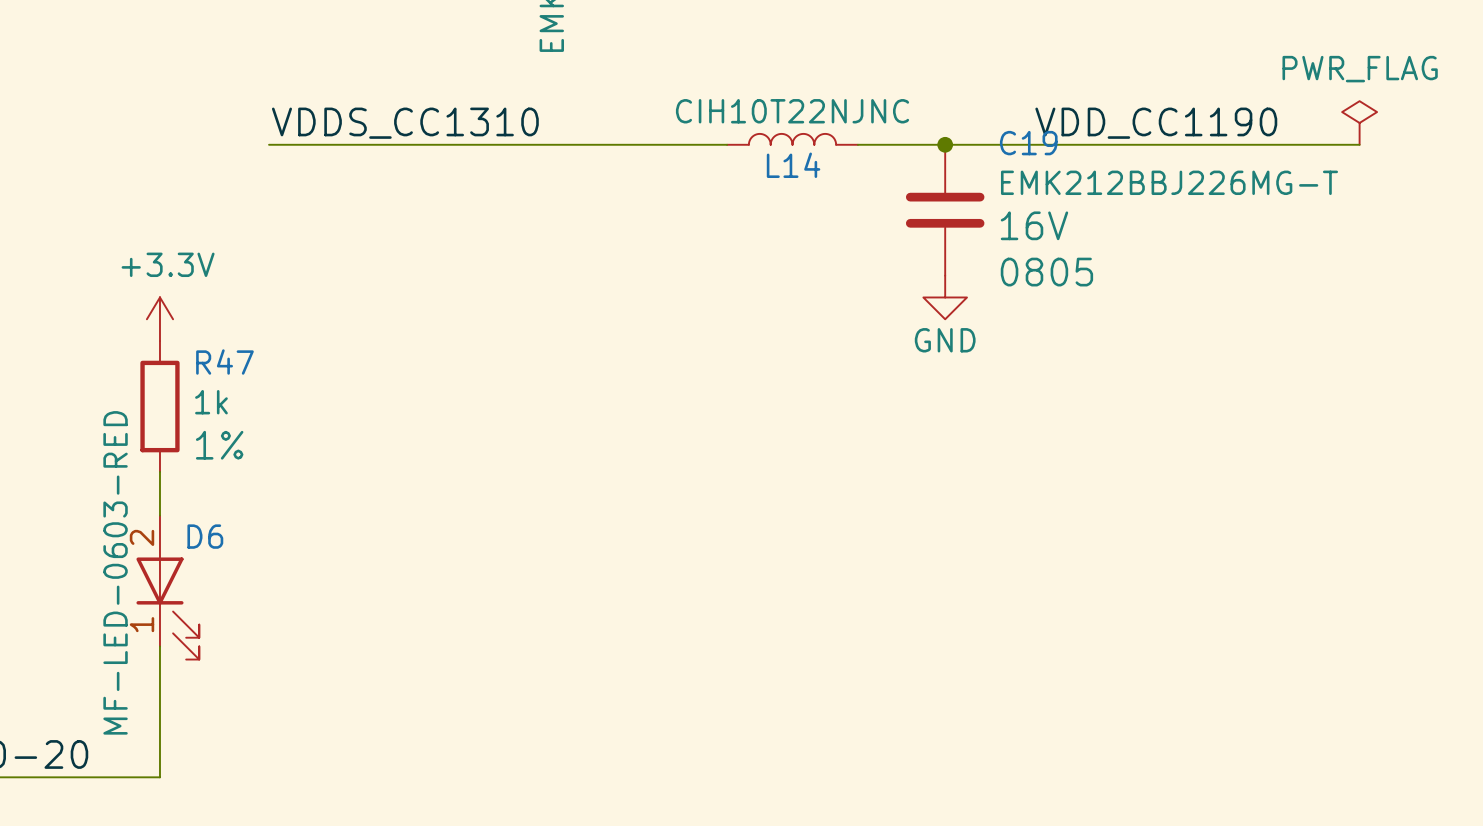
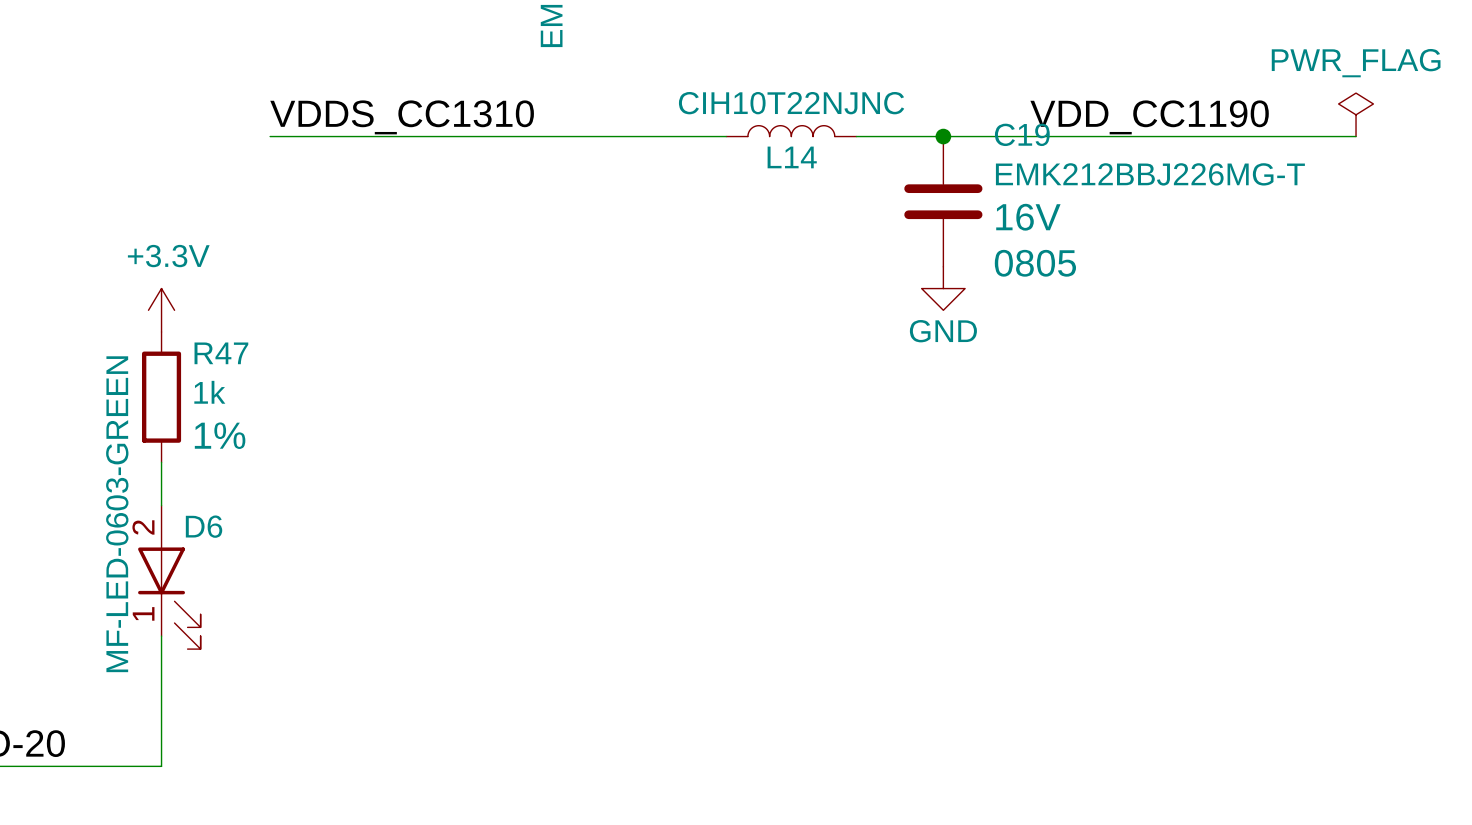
D6 value: MF-LED-0603-RED (115, 572) -> MF-LED-0603-GREEN (117, 514)

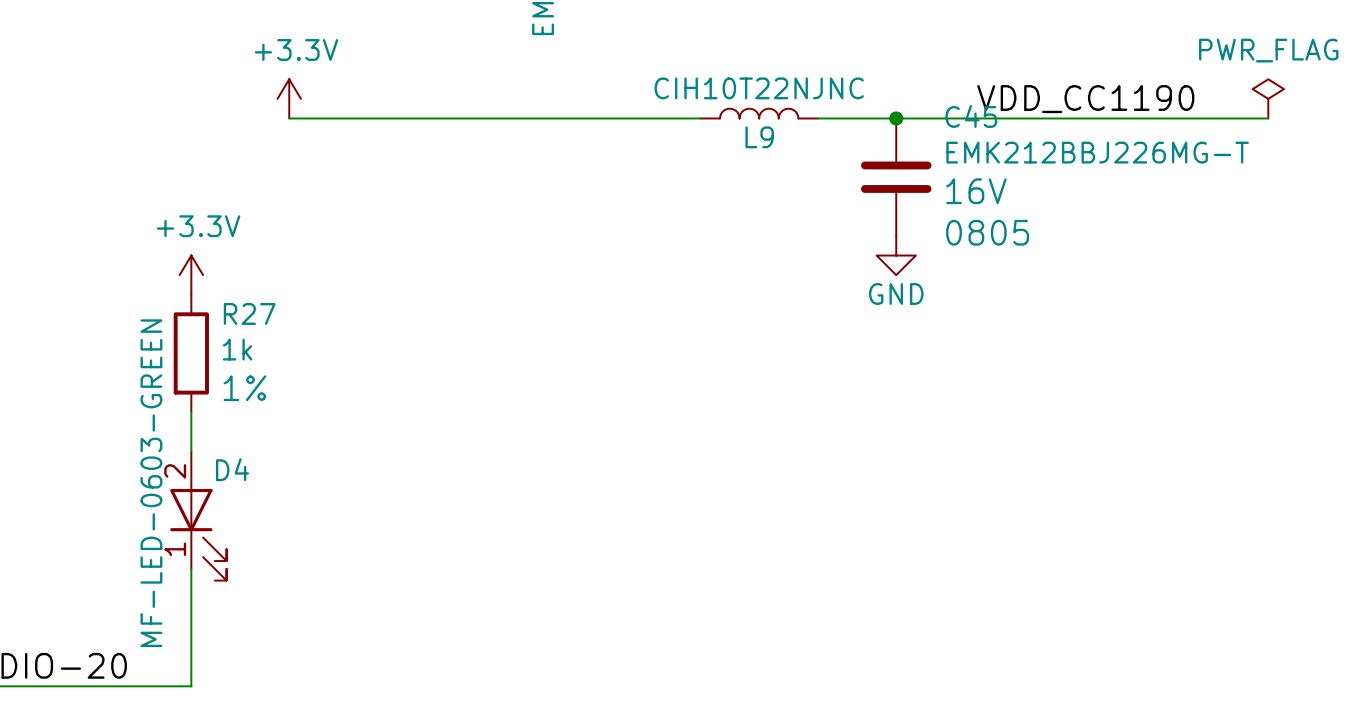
power symbol: none -> +3.3V (289, 98)
label: VDDS_CC1310 (402, 117) -> none
C19 name: C19 (1022, 134) -> C45 (971, 116)
L14 name: L14 (792, 157) -> L9 (759, 137)
R47 name: R47 (221, 353) -> R27 (249, 313)
D6 name: D6 (204, 526) -> D4 (232, 469)

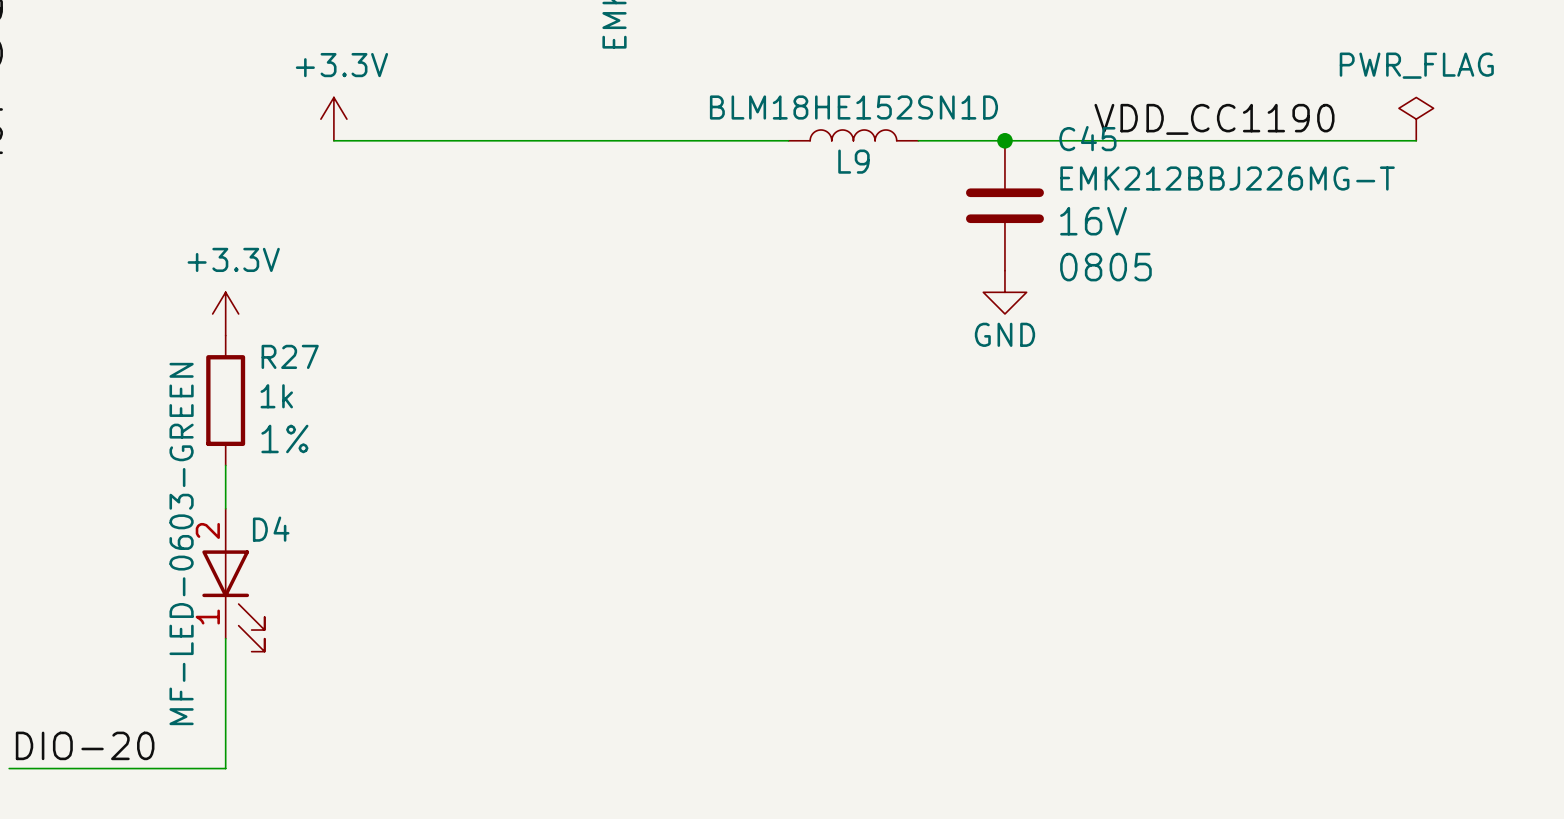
L9 value: CIH10T22NJNC (759, 88) -> BLM18HE152SN1D (853, 107)

